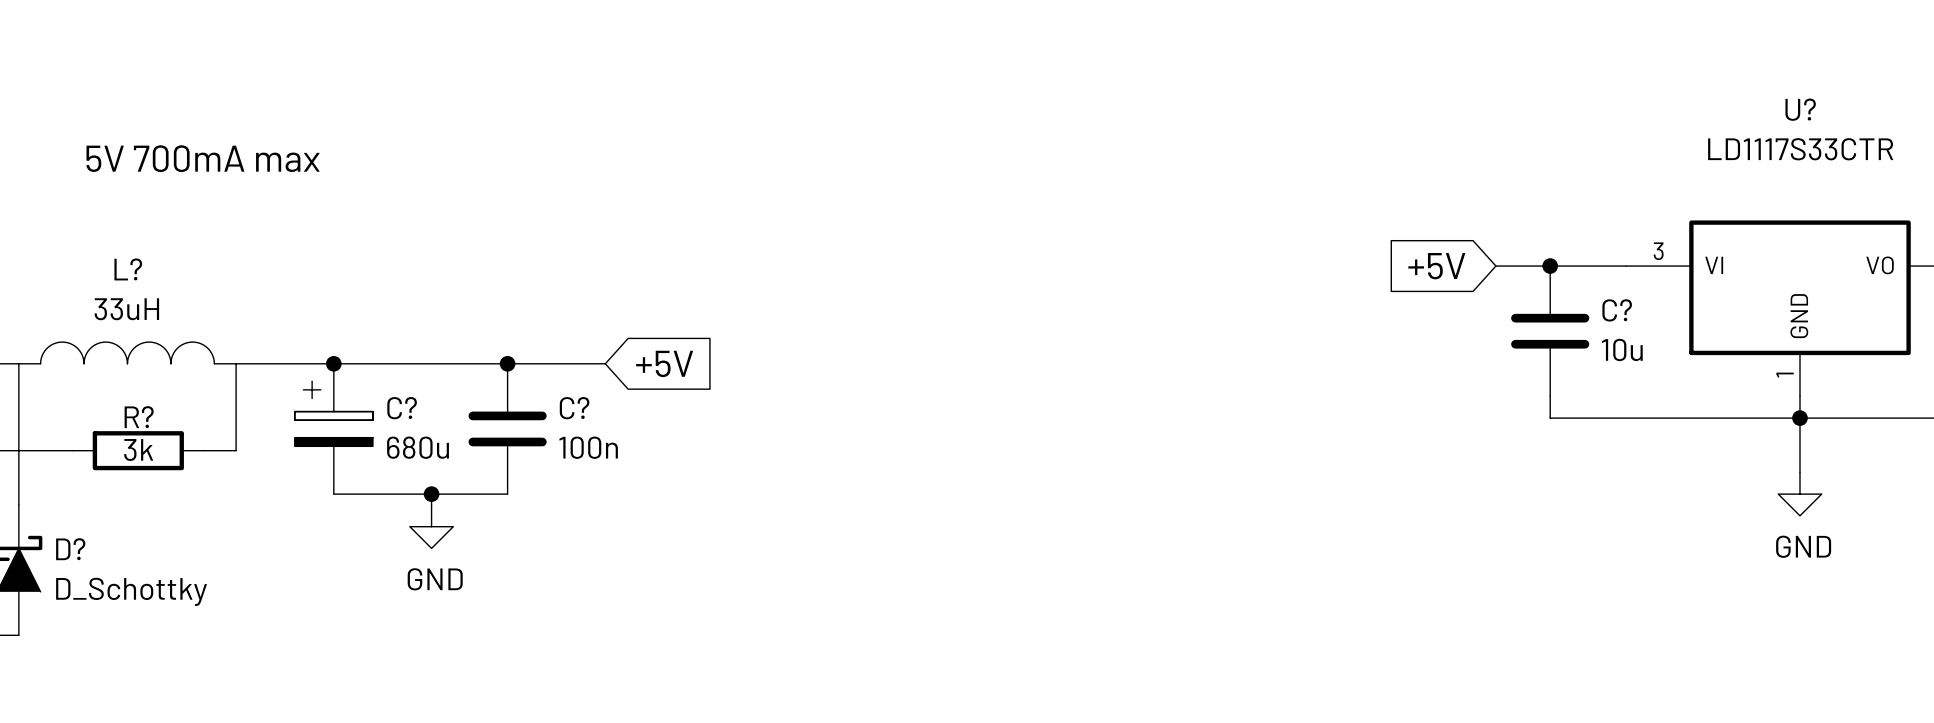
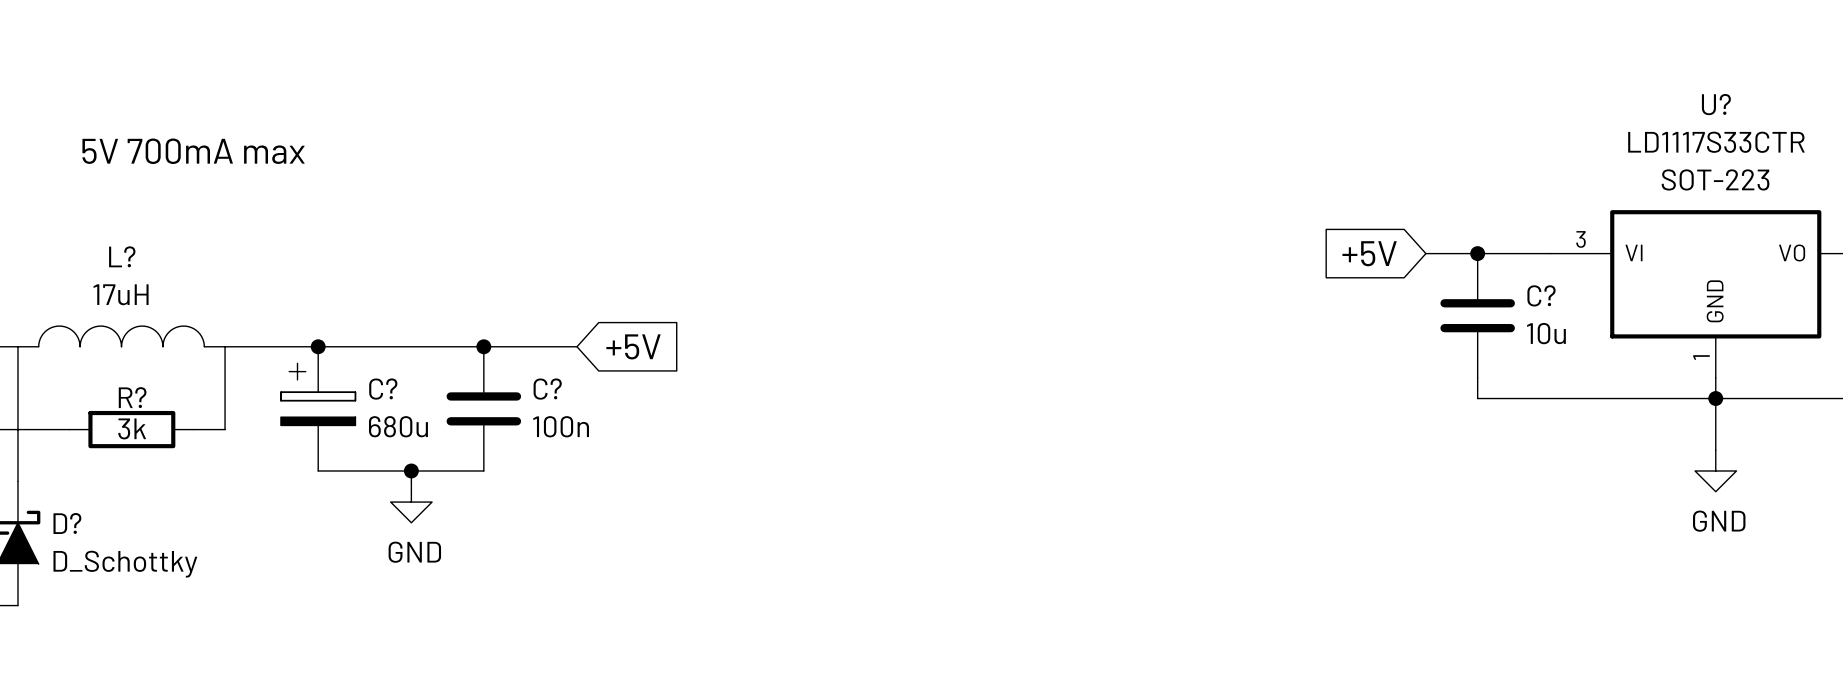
U? text: none -> SOT-223 (1715, 179)
L? value: 33uH (126, 309) -> 17uH (121, 294)

